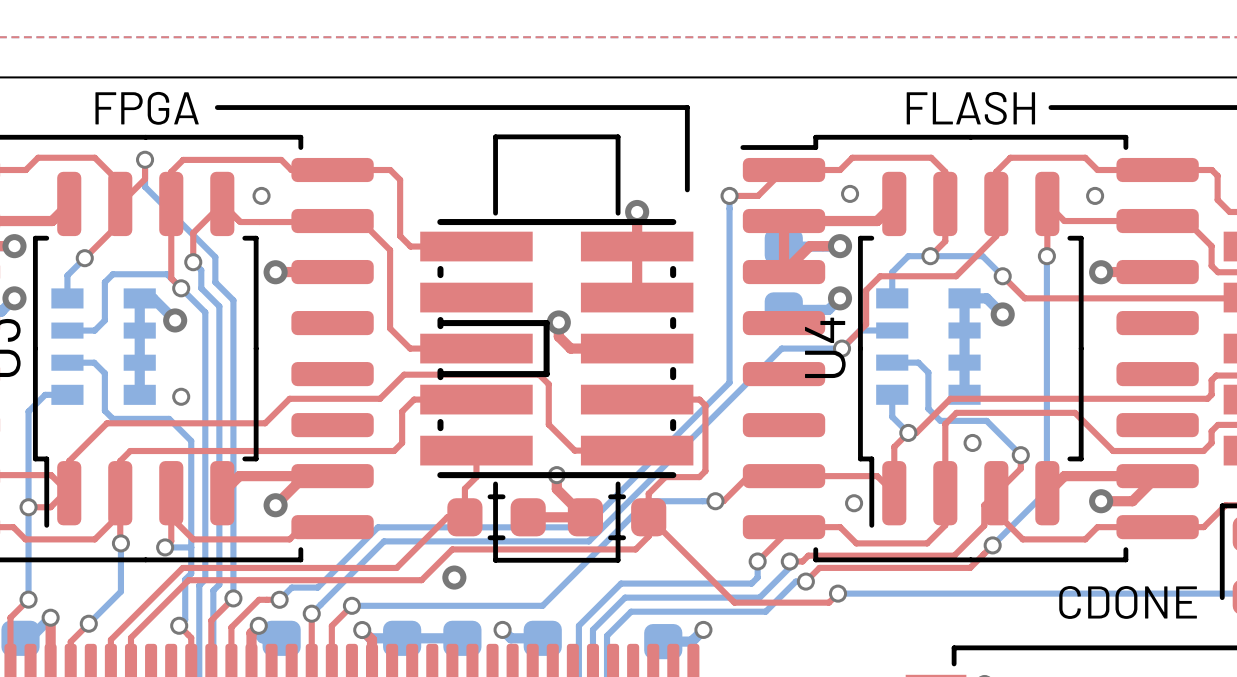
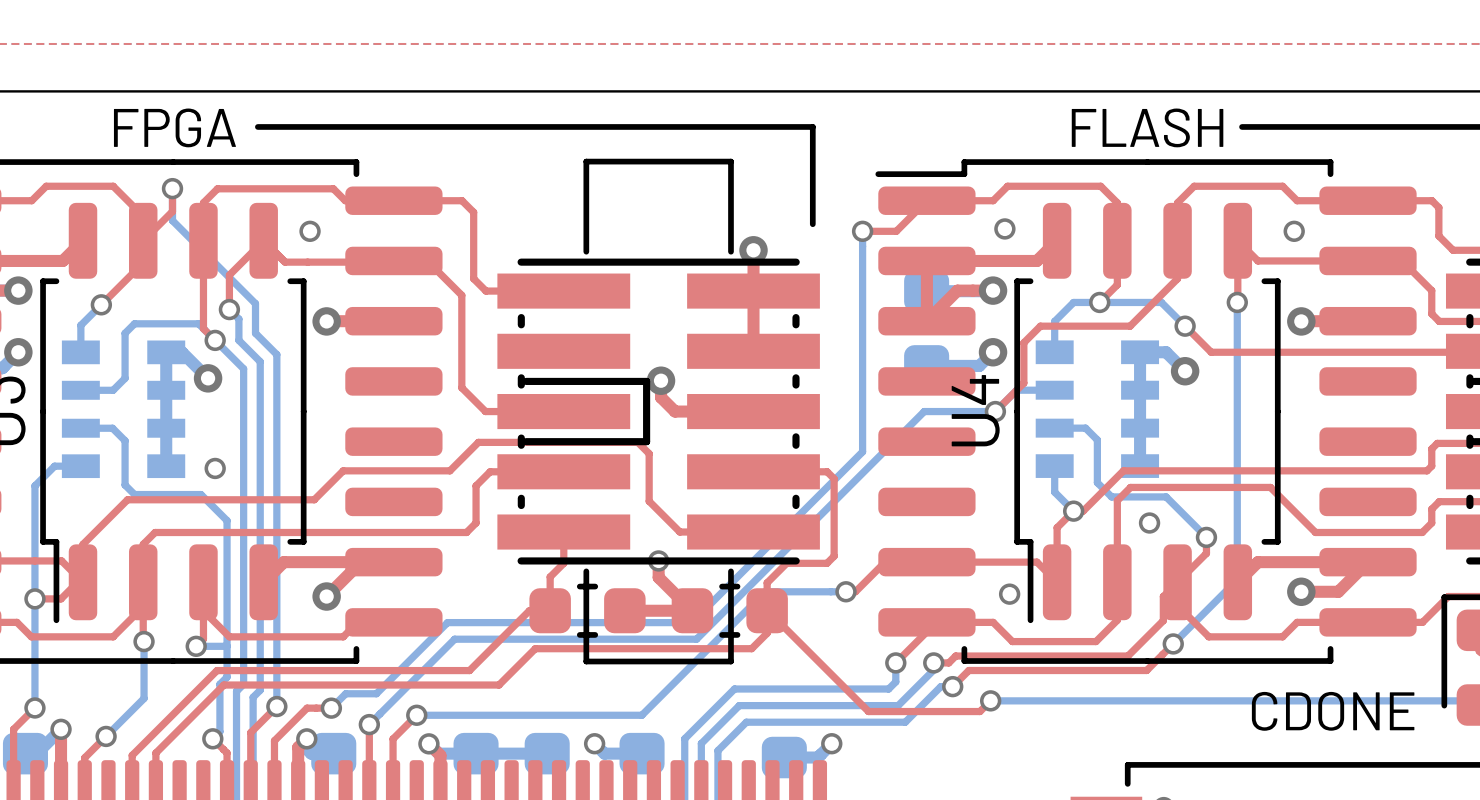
via: (454, 577) -> none

